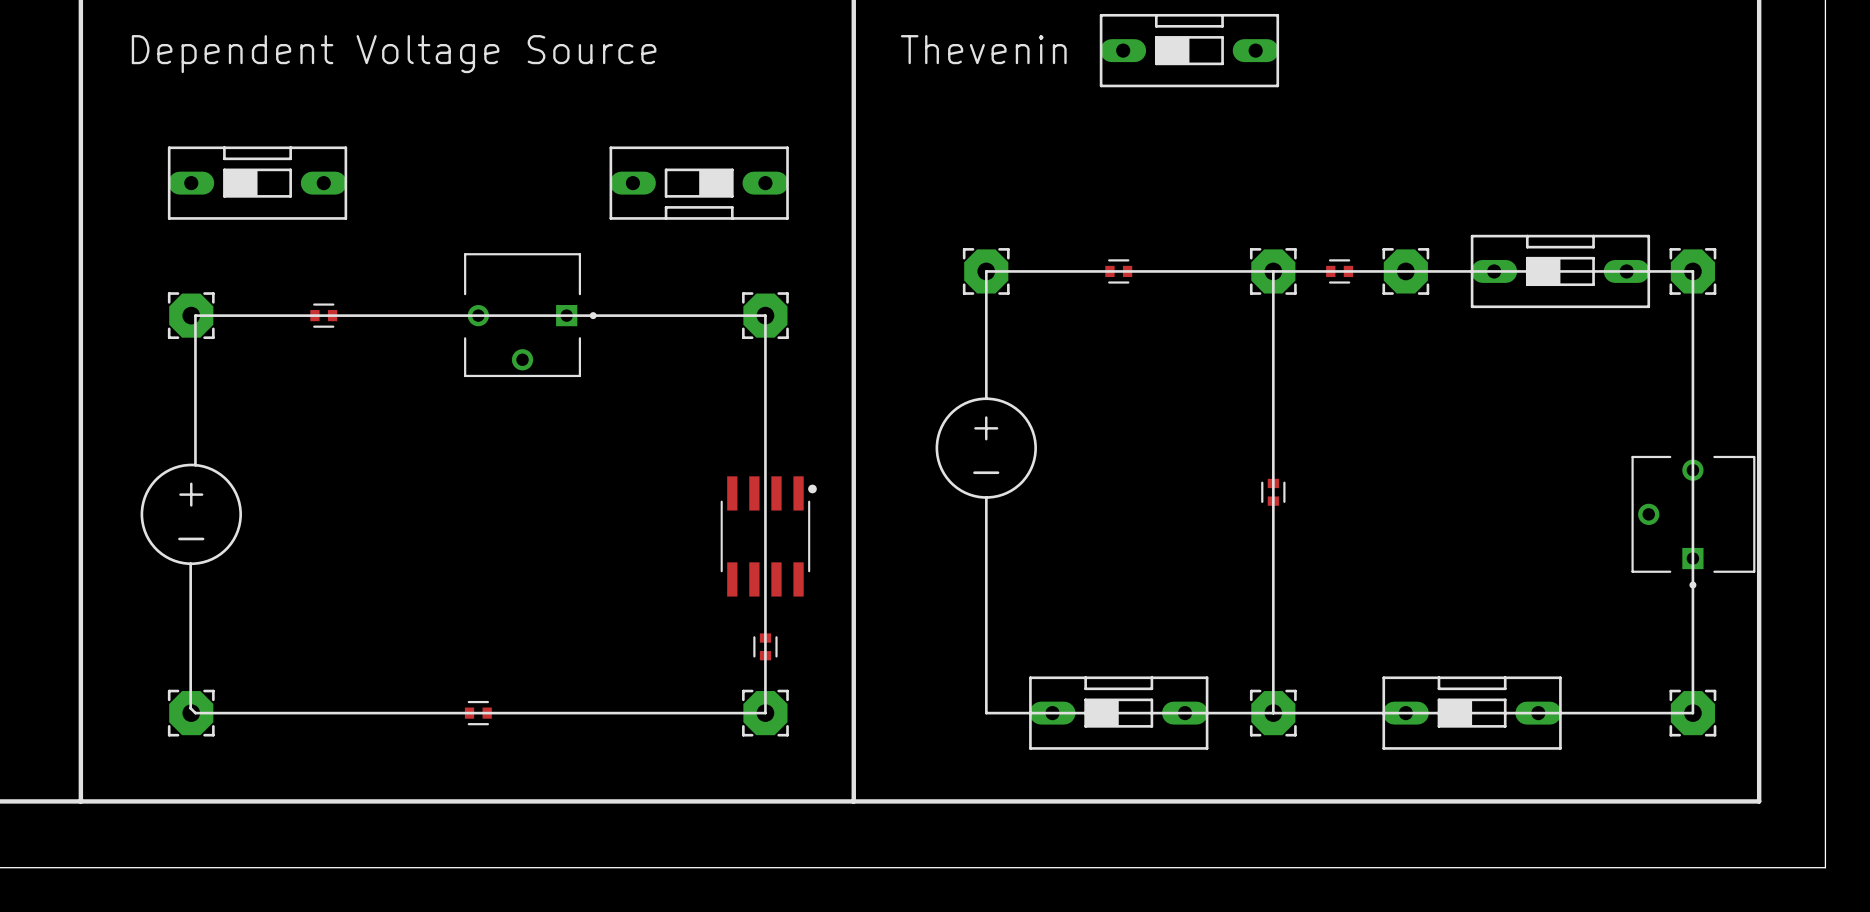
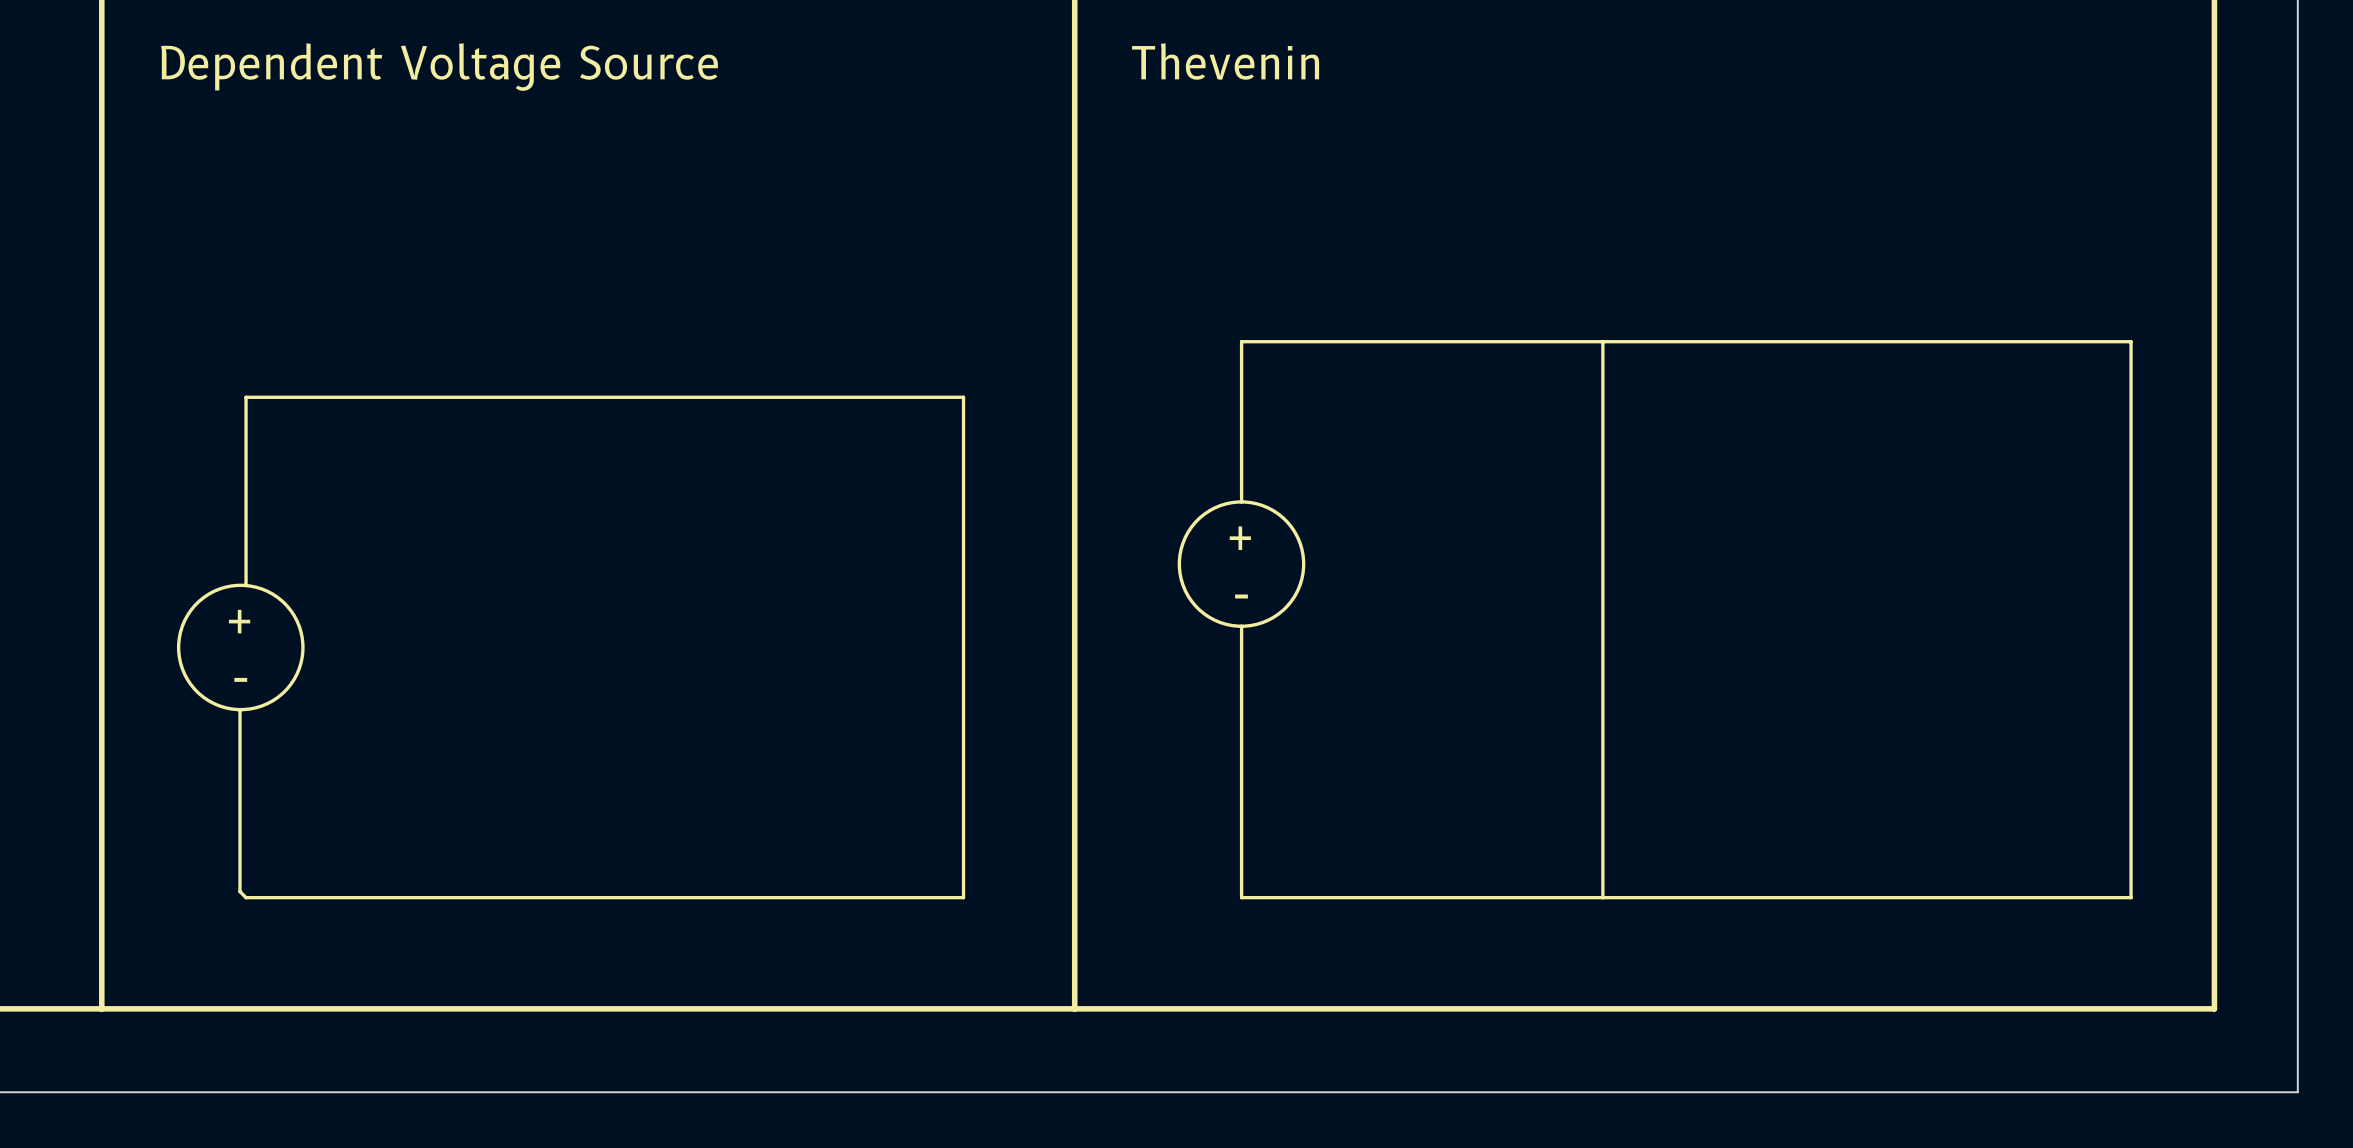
part: (1189, 50) -> none
part: (257, 183) -> none
part: (699, 183) -> none
part: (986, 271) -> none
part: (1118, 271) -> none
part: (1273, 271) -> none
part: (1339, 271) -> none
part: (1405, 271) -> none
part: (1560, 271) -> none
part: (1692, 271) -> none
part: (191, 315) -> none
part: (323, 315) -> none
part: (530, 315) -> none
part: (765, 315) -> none
part: (1273, 492) -> none
part: (1693, 522) -> none
part: (768, 536) -> none
part: (765, 646) -> none
part: (191, 713) -> none
part: (478, 713) -> none
part: (765, 713) -> none
part: (1118, 713) -> none
part: (1273, 713) -> none
part: (1472, 713) -> none
part: (1692, 713) -> none

